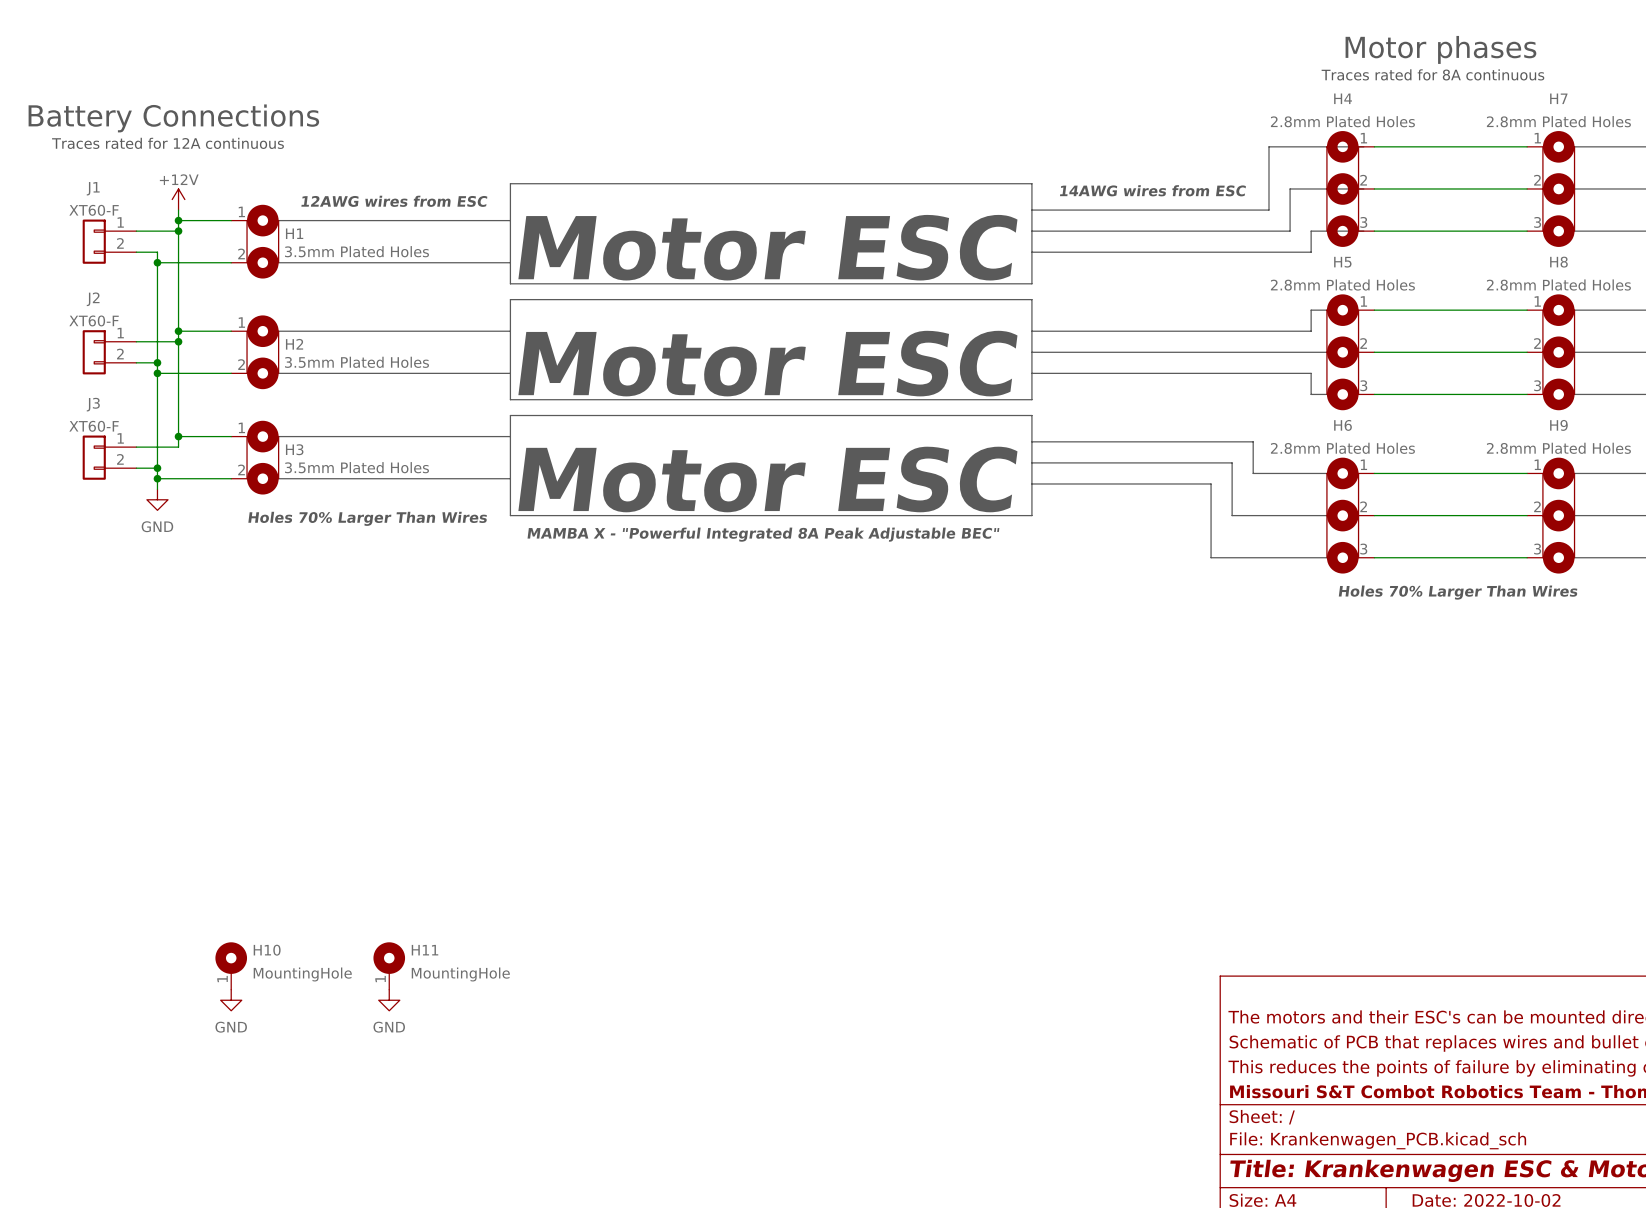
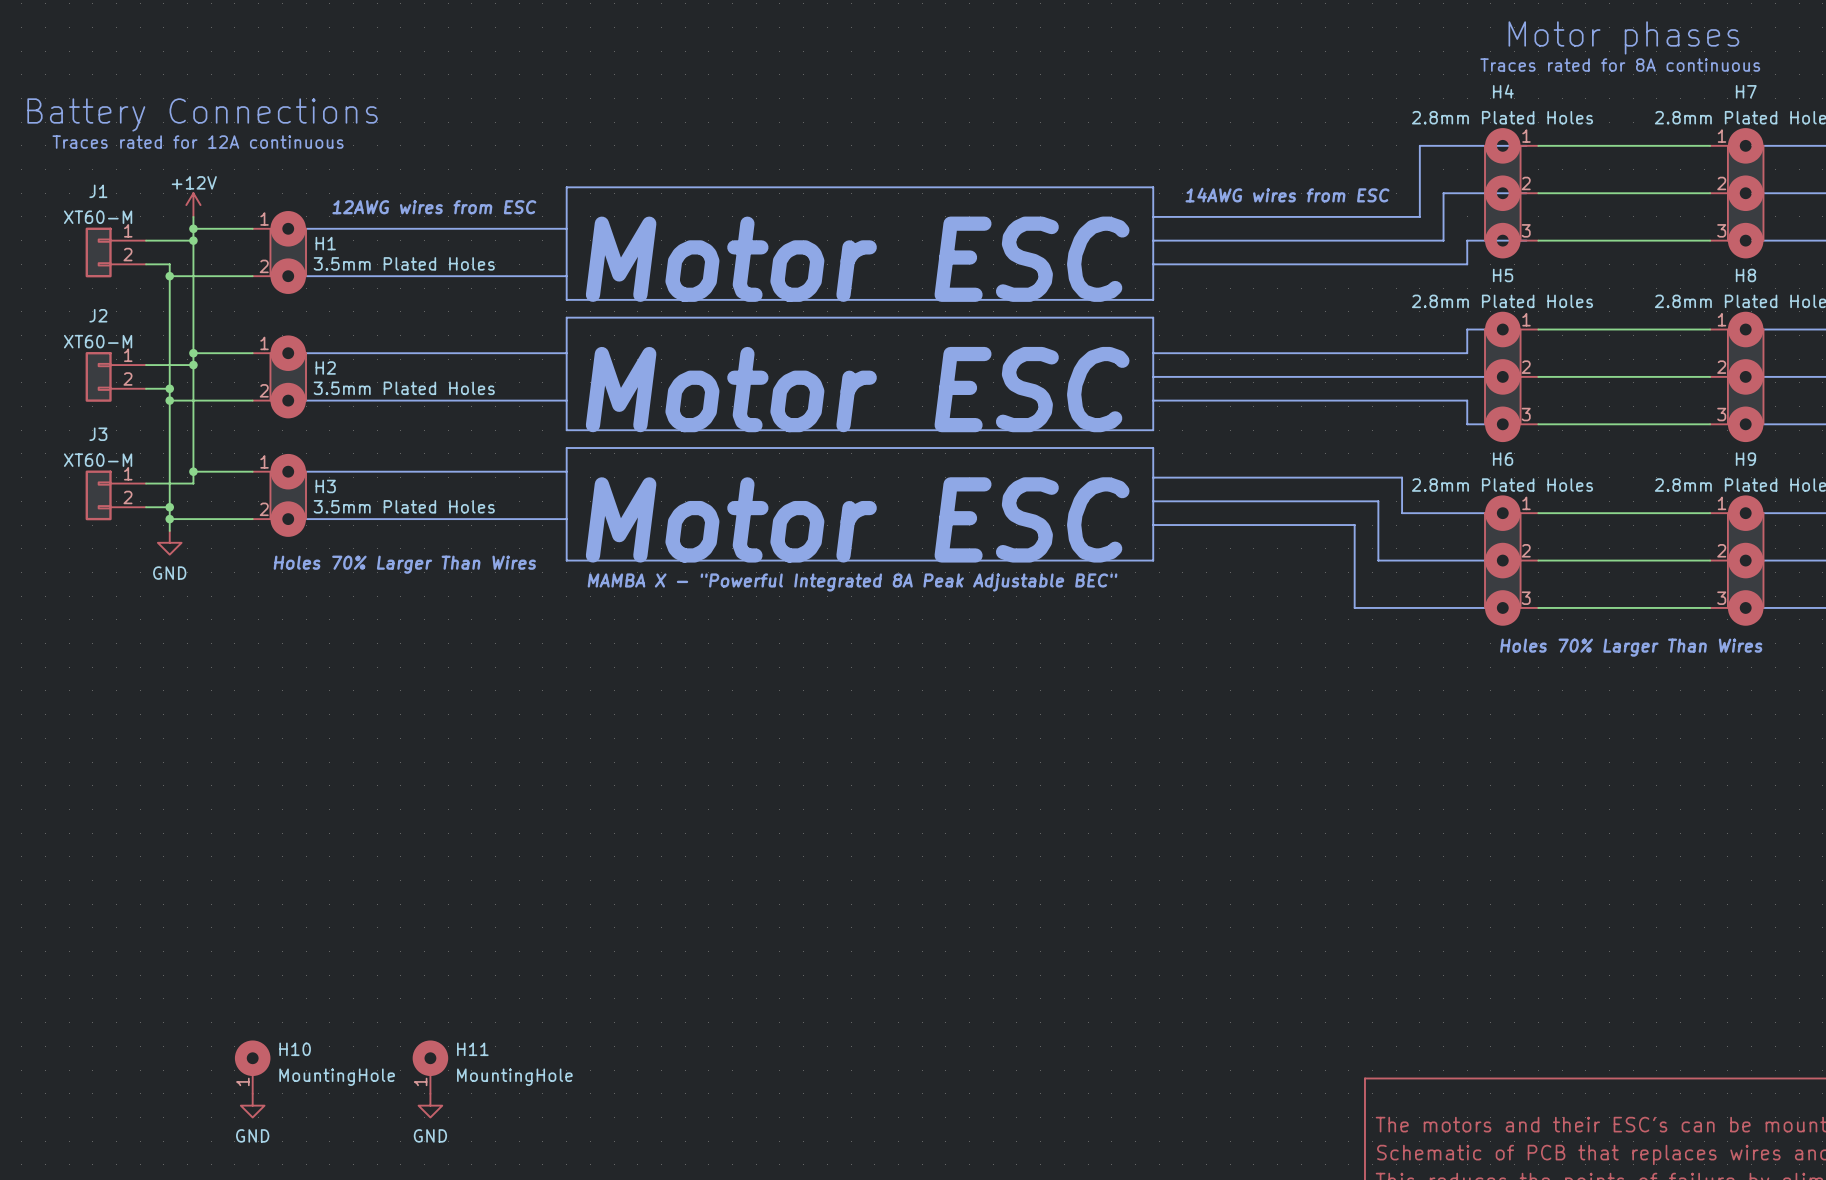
J1 value: XT60-F (94, 210) -> XT60-M (98, 217)
J2 value: XT60-F (94, 320) -> XT60-M (98, 341)
J3 value: XT60-F (94, 426) -> XT60-M (98, 460)

